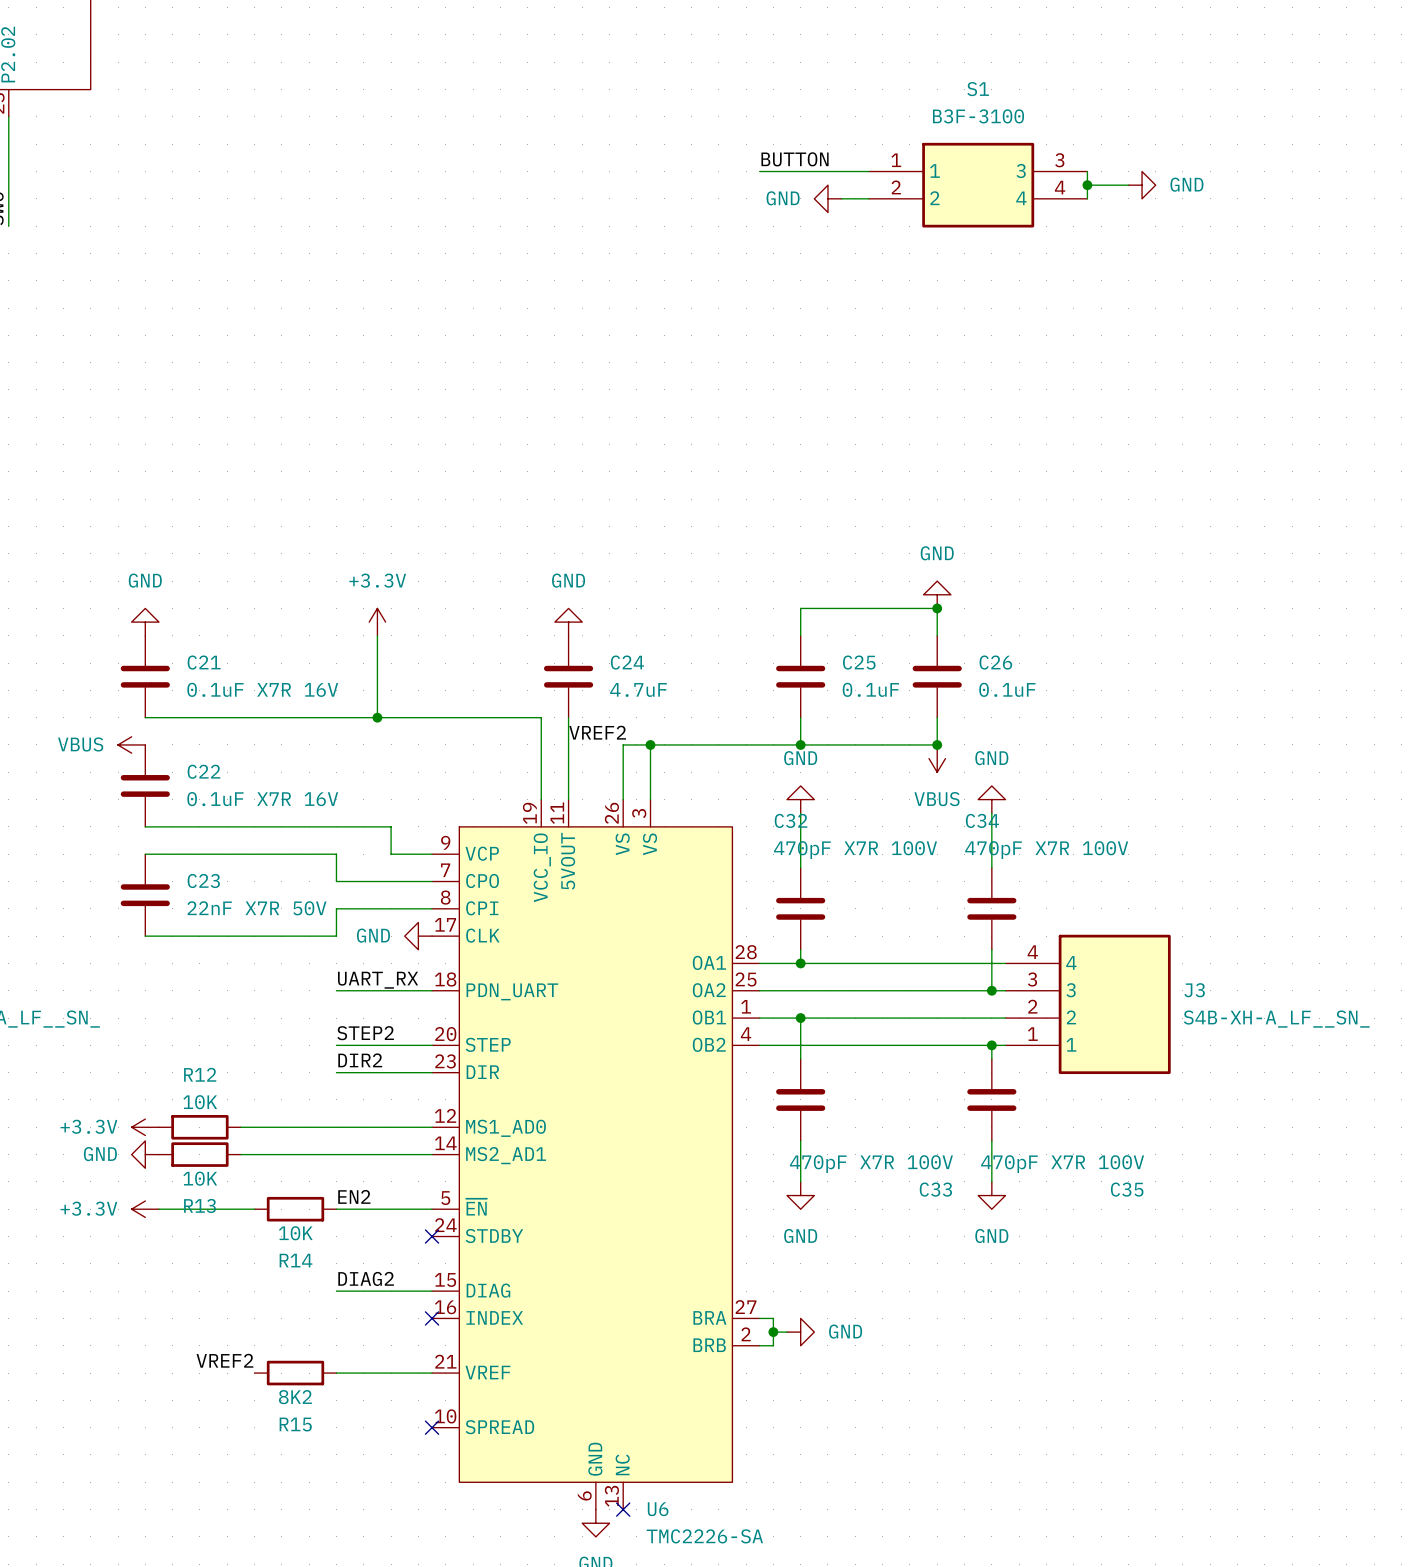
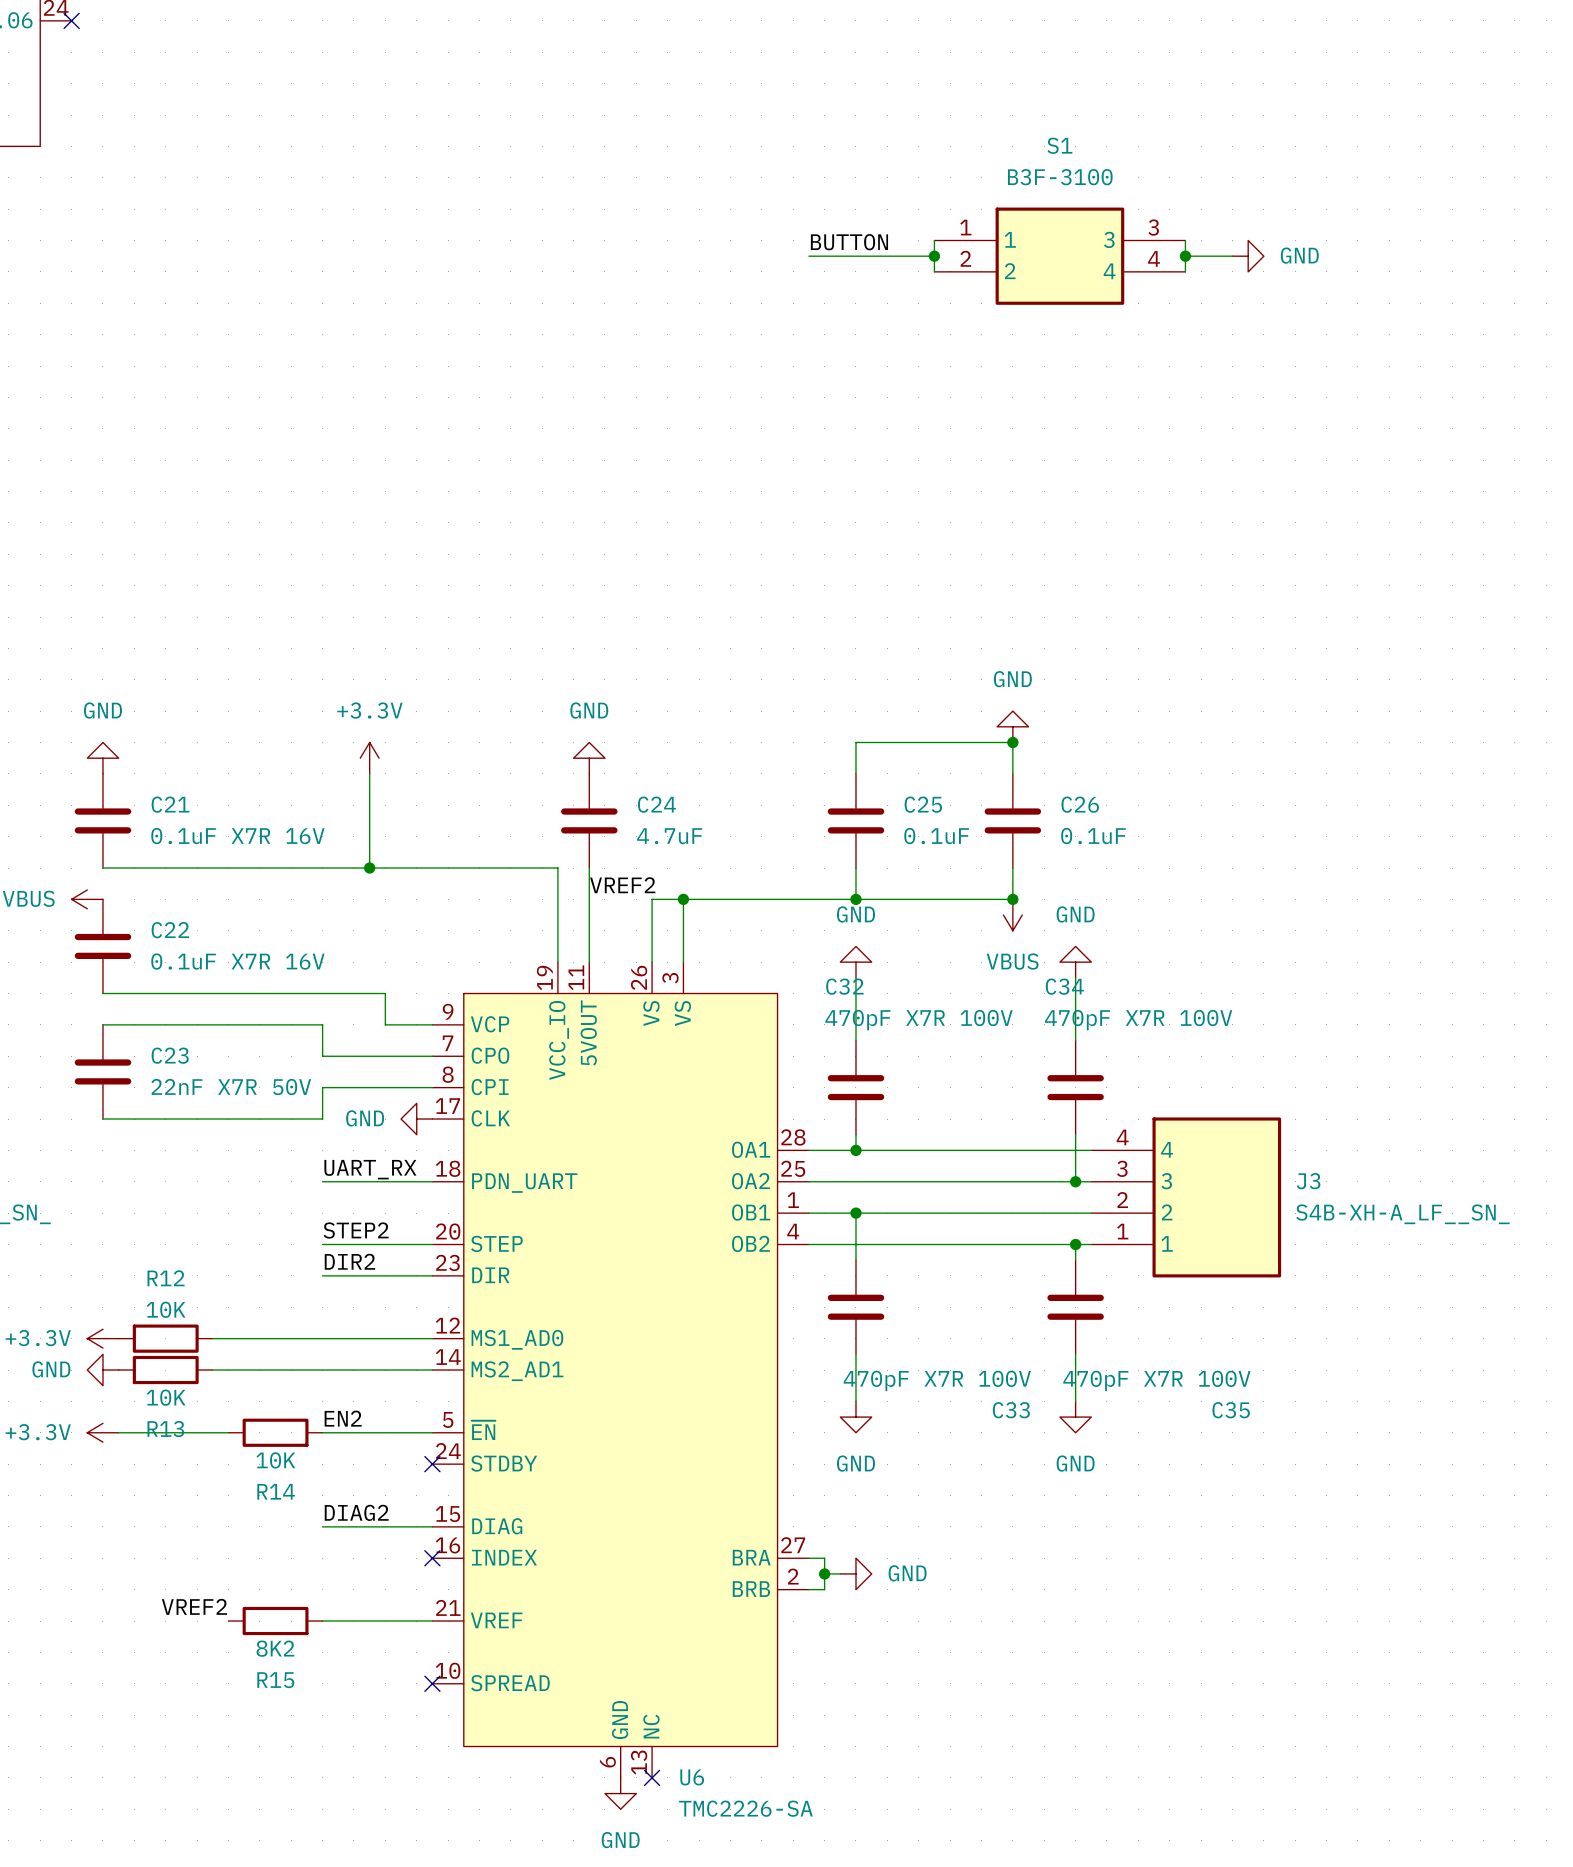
label position: BUTTON (795, 159) -> BUTTON (849, 242)
wire: (759, 171) (868, 171) -> (808, 256) (934, 256)
junction: none -> (934, 256)
power symbol: GND (827, 198) -> none
wire: (841, 198) (868, 198) -> (934, 240) (934, 271)

